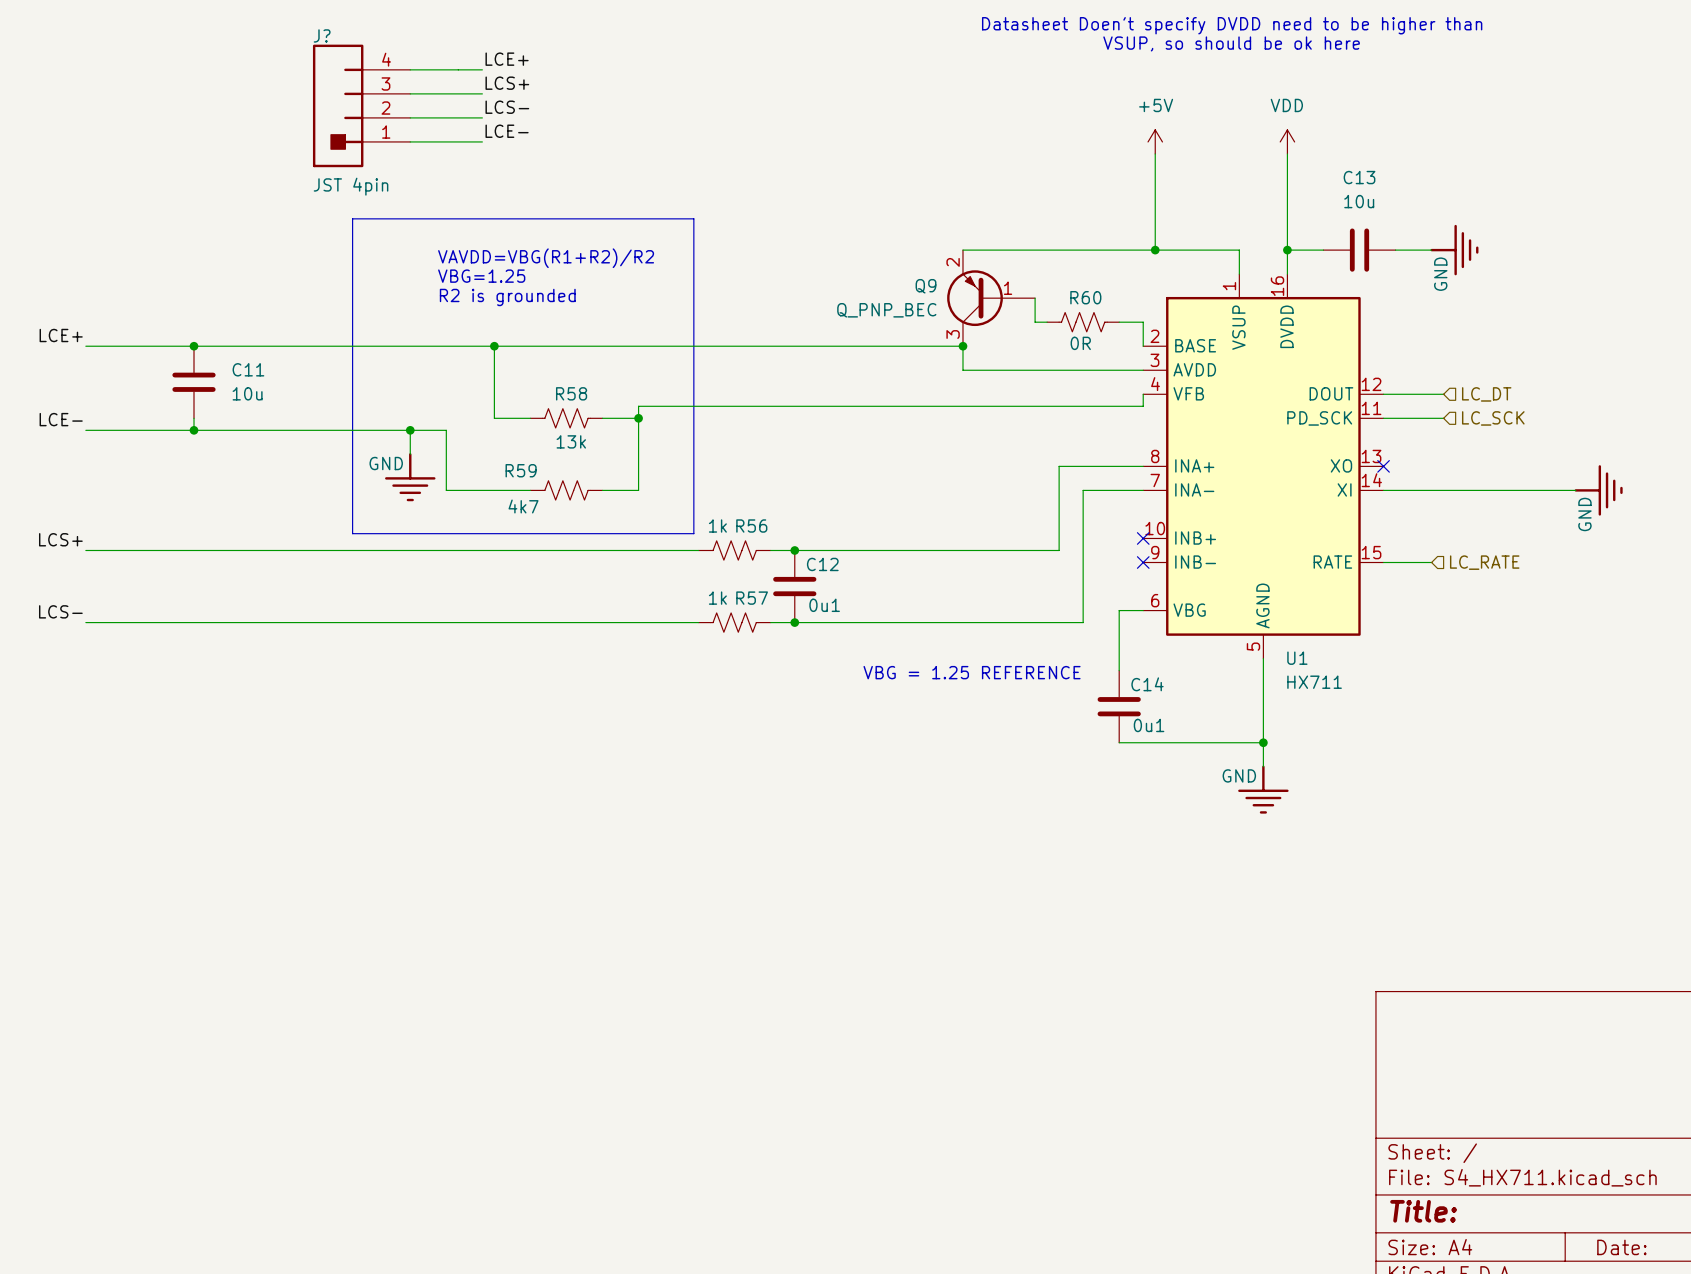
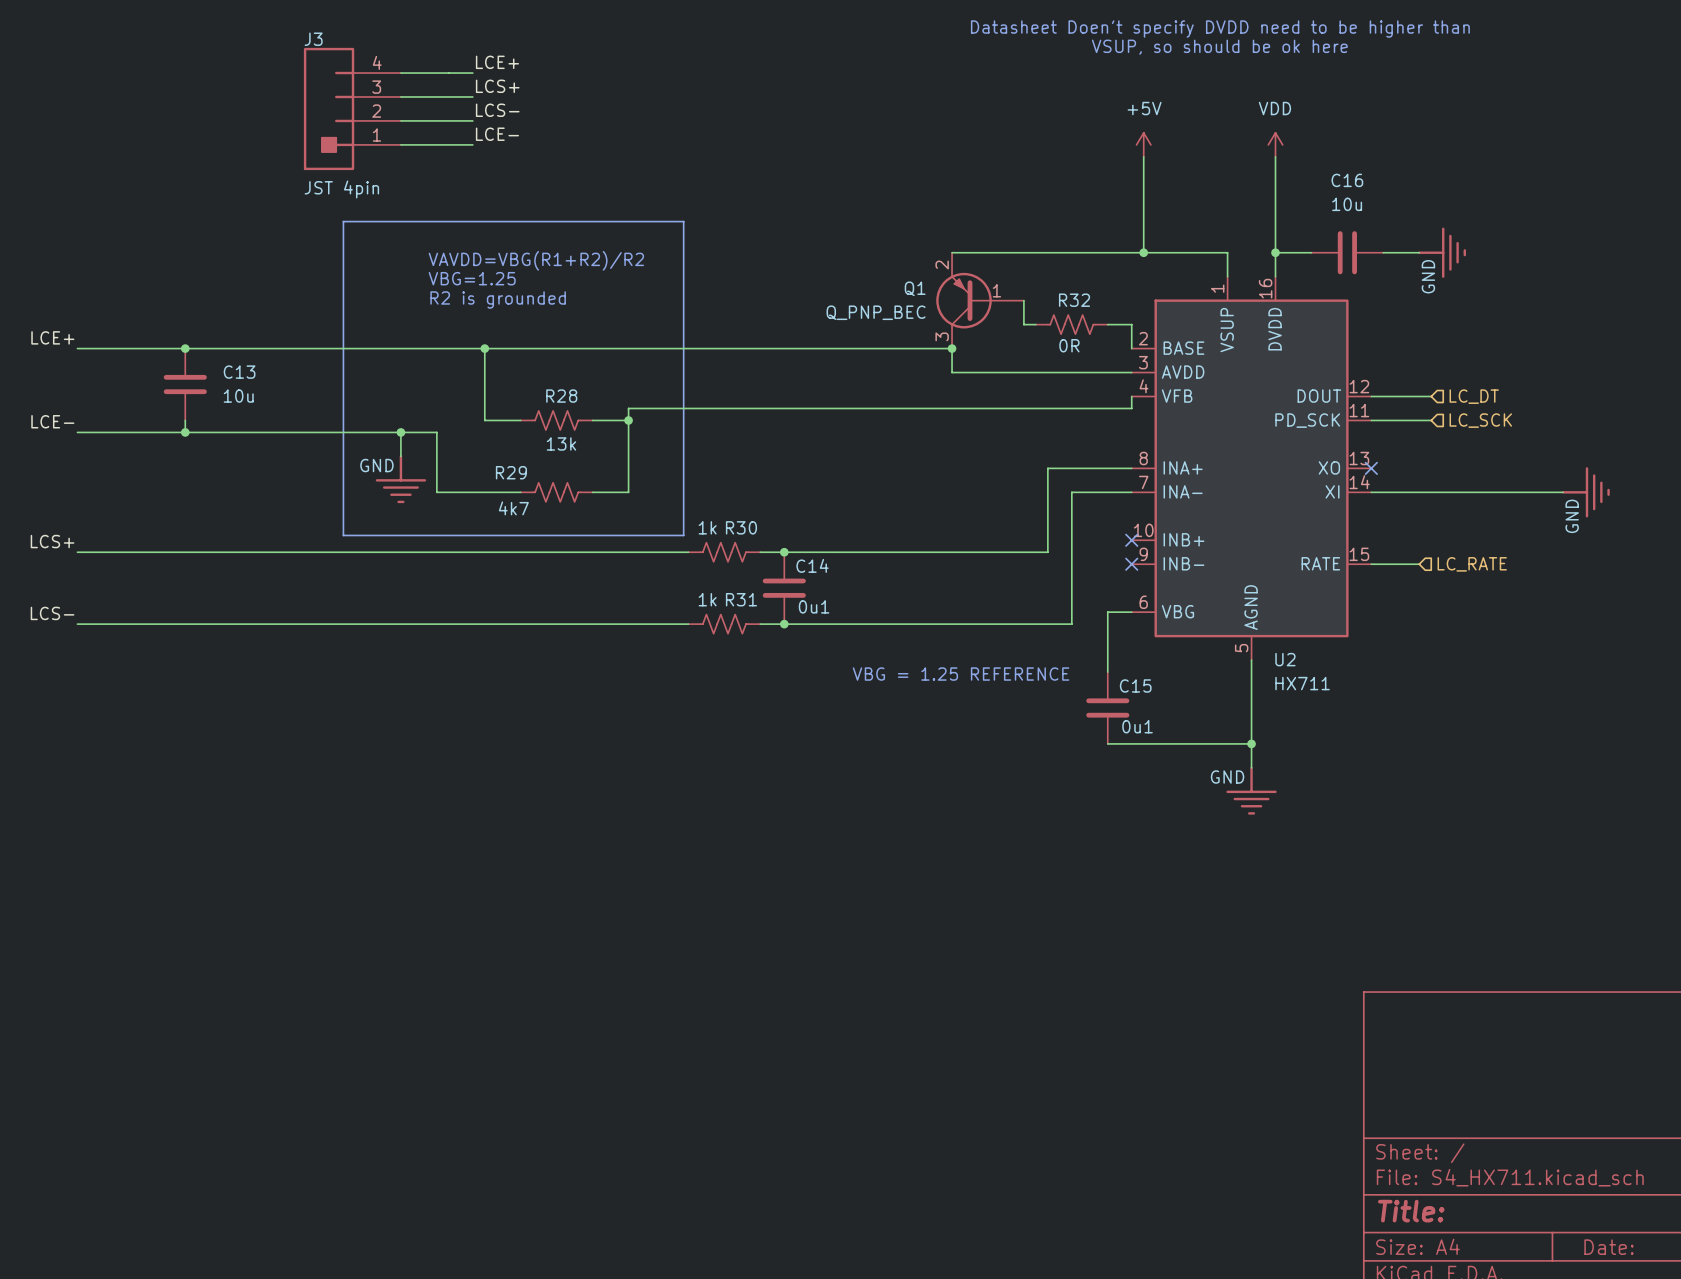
J? name: J? (322, 35) -> J3 (313, 39)
C13 name: C13 (1359, 177) -> C16 (1347, 180)
Q9 name: Q9 (926, 286) -> Q1 (915, 288)
R60 name: R60 (1085, 297) -> R32 (1074, 300)
C11 name: C11 (248, 369) -> C13 (239, 372)
R58 name: R58 (571, 393) -> R28 (561, 396)
R59 name: R59 (521, 470) -> R29 (511, 472)
R56 name: R56 (751, 526) -> R30 (741, 527)
C12 name: C12 (822, 564) -> C14 (812, 565)
R57 name: R57 (752, 598) -> R31 (741, 599)
U1 name: U1 (1297, 658) -> U2 (1285, 659)
C14 name: C14 (1147, 684) -> C15 (1135, 685)

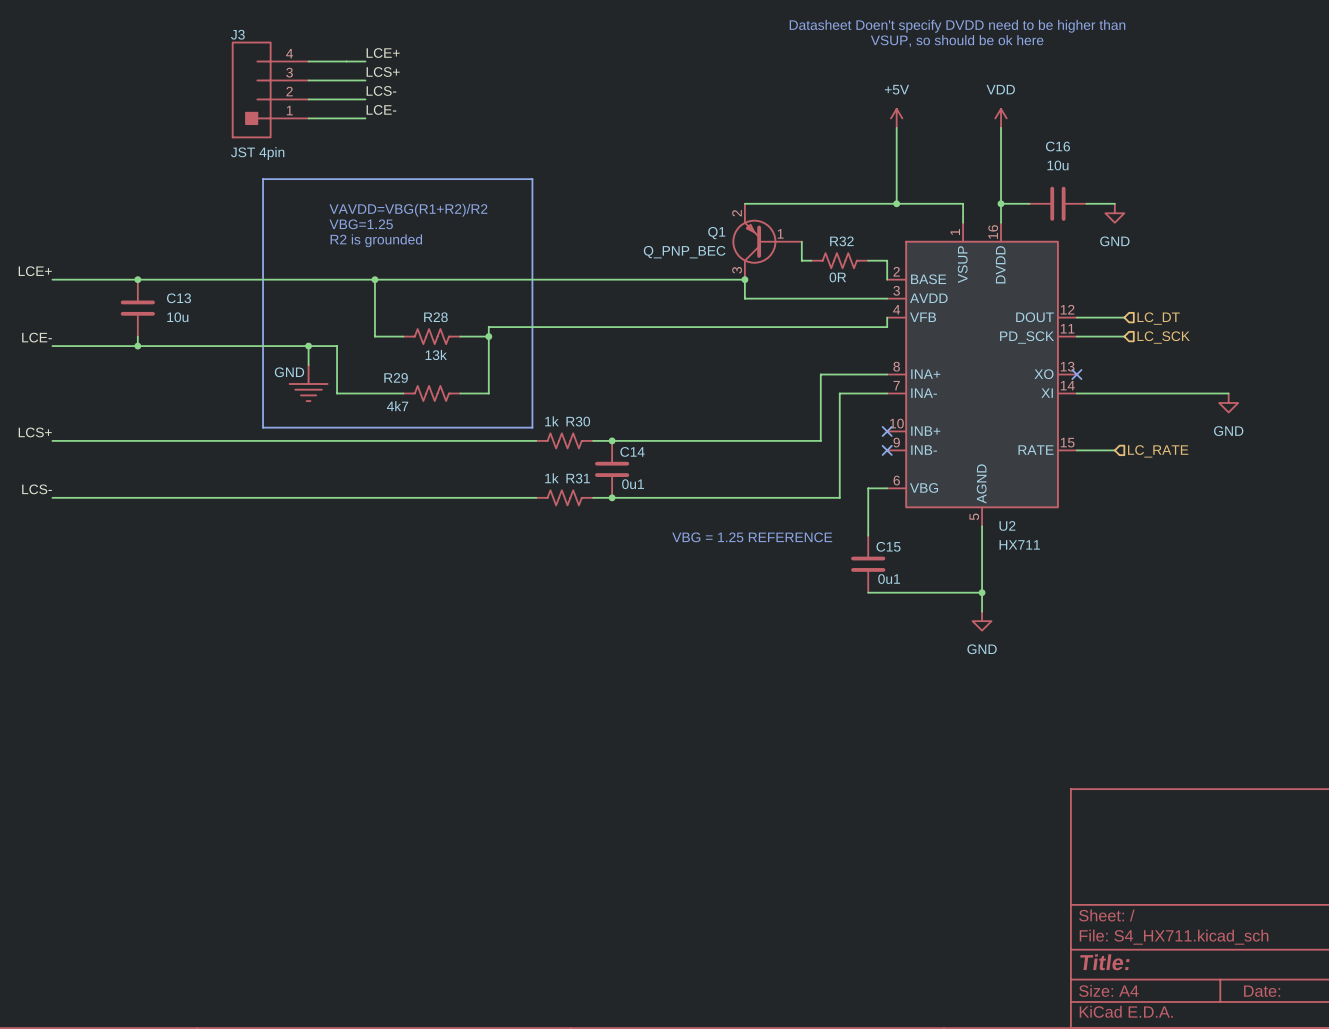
power symbol: GND (1442, 252) -> none
power symbol: none -> GND (1114, 213)
power symbol: GND (1585, 492) -> none
power symbol: none -> GND (1228, 402)
power symbol: none -> GND (982, 621)
power symbol: GND (1251, 790) -> none

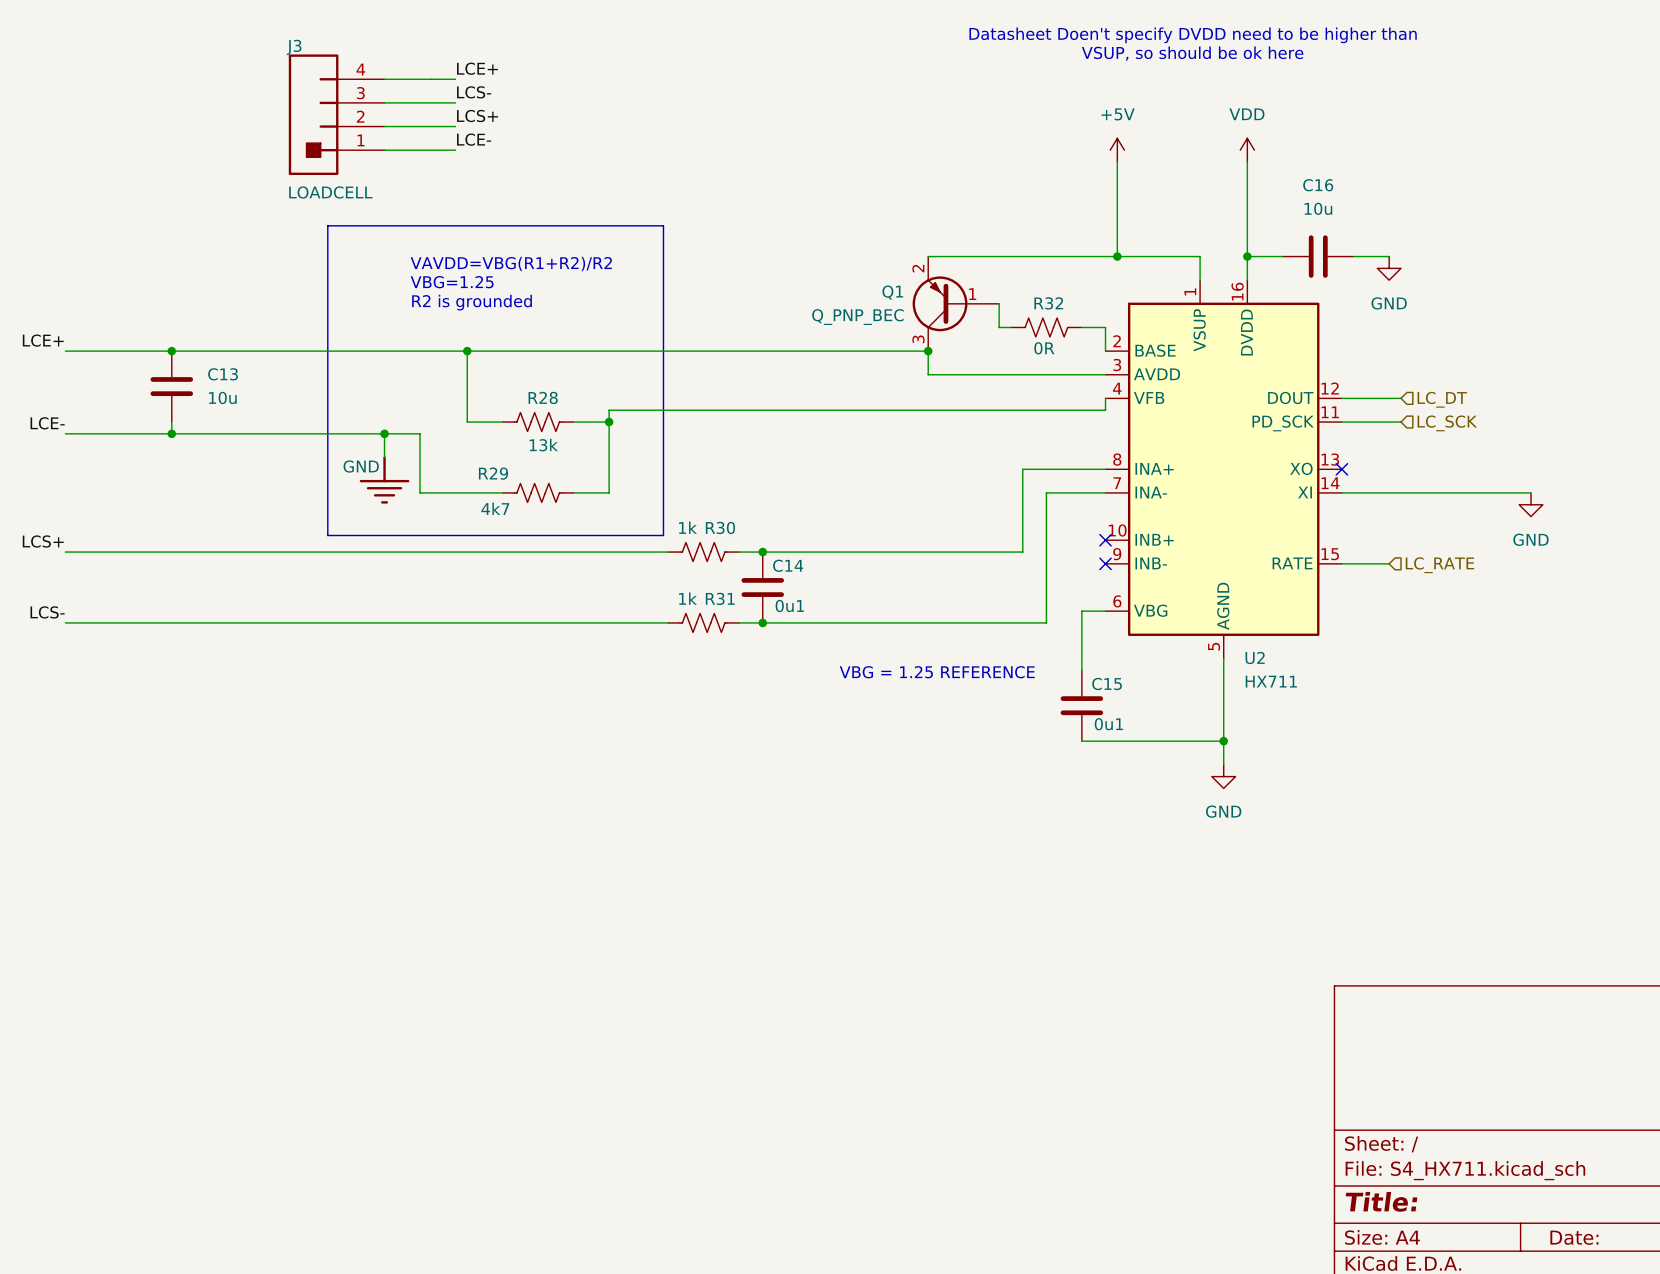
label: LCS+ (383, 72) -> LCS- (474, 92)
label: LCS- (381, 90) -> LCS+ (477, 116)
J3 value: JST 4pin (257, 153) -> LOADCELL (330, 192)

